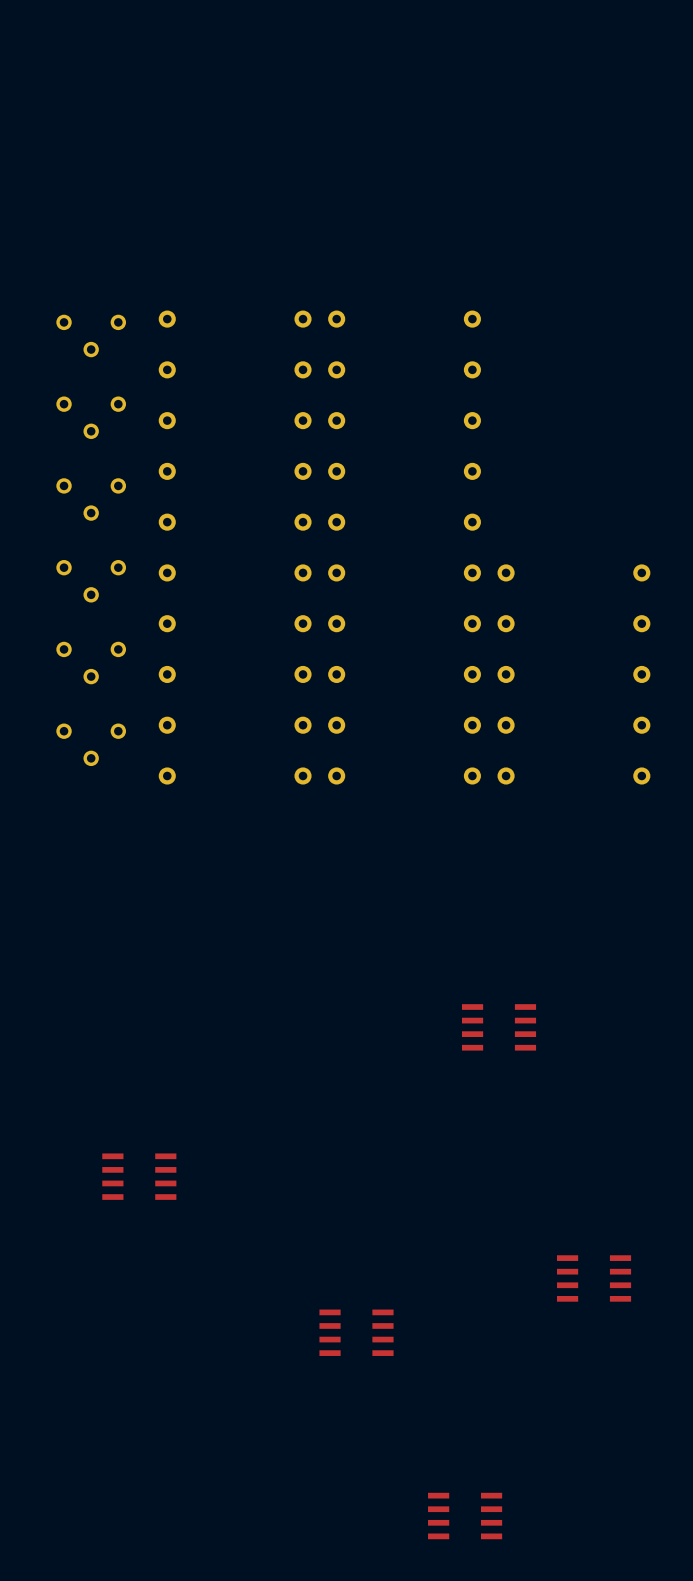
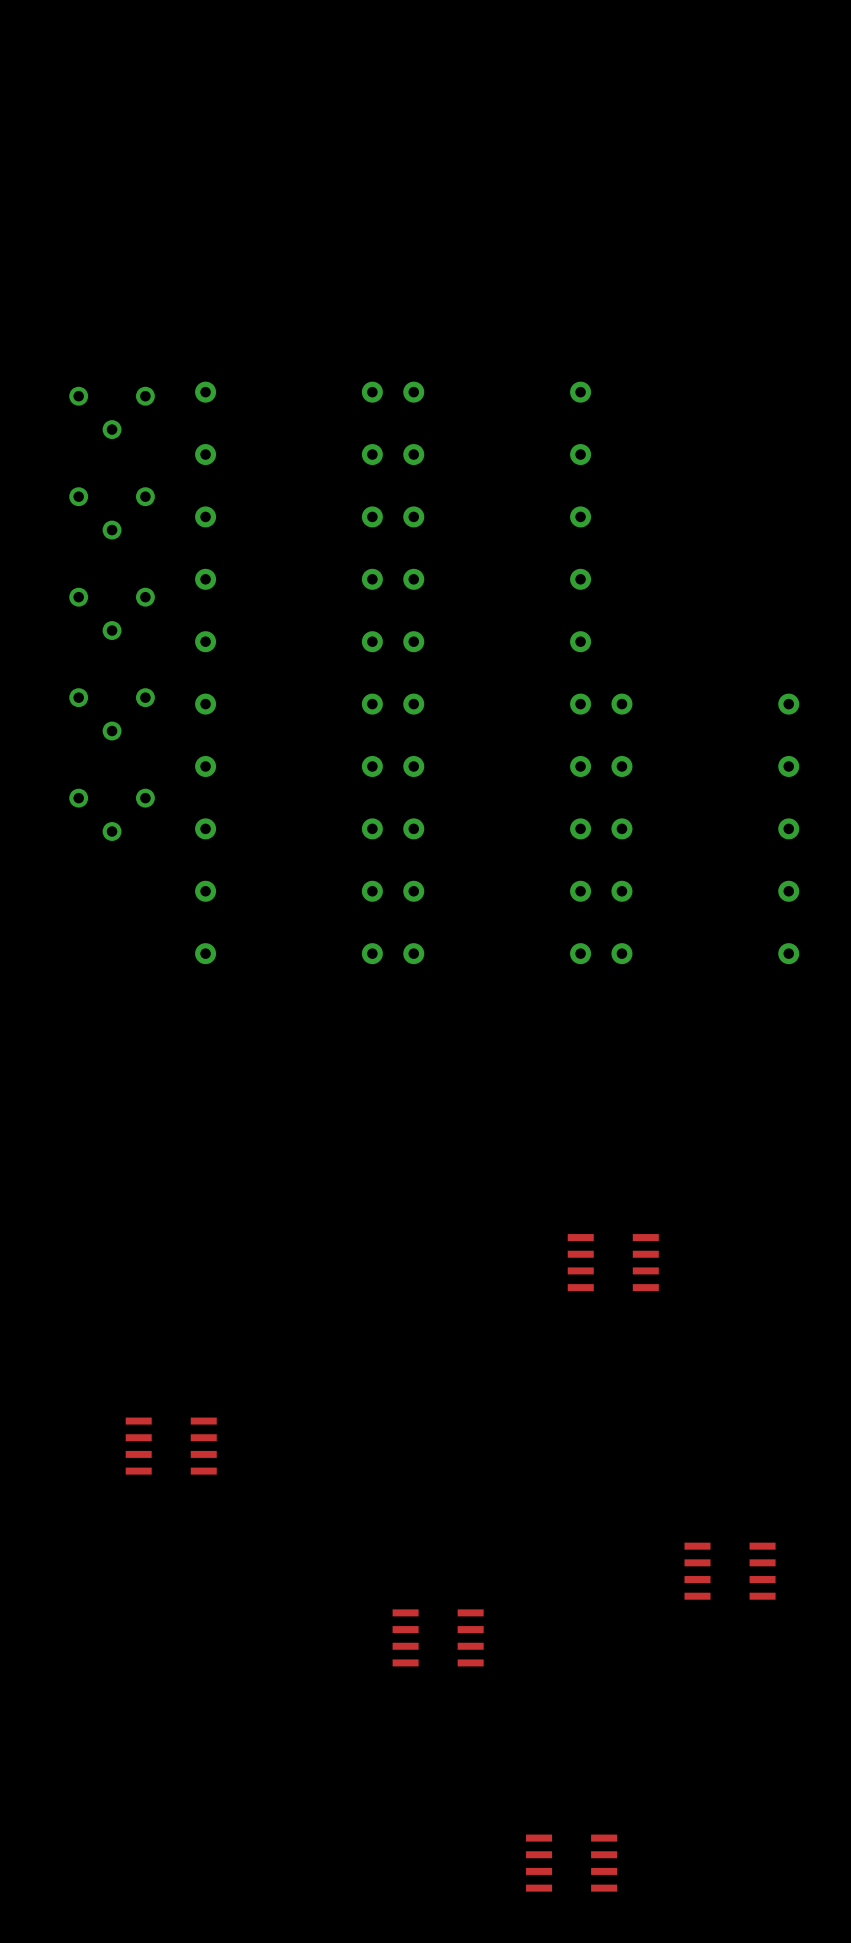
part: (91, 744) -> none

